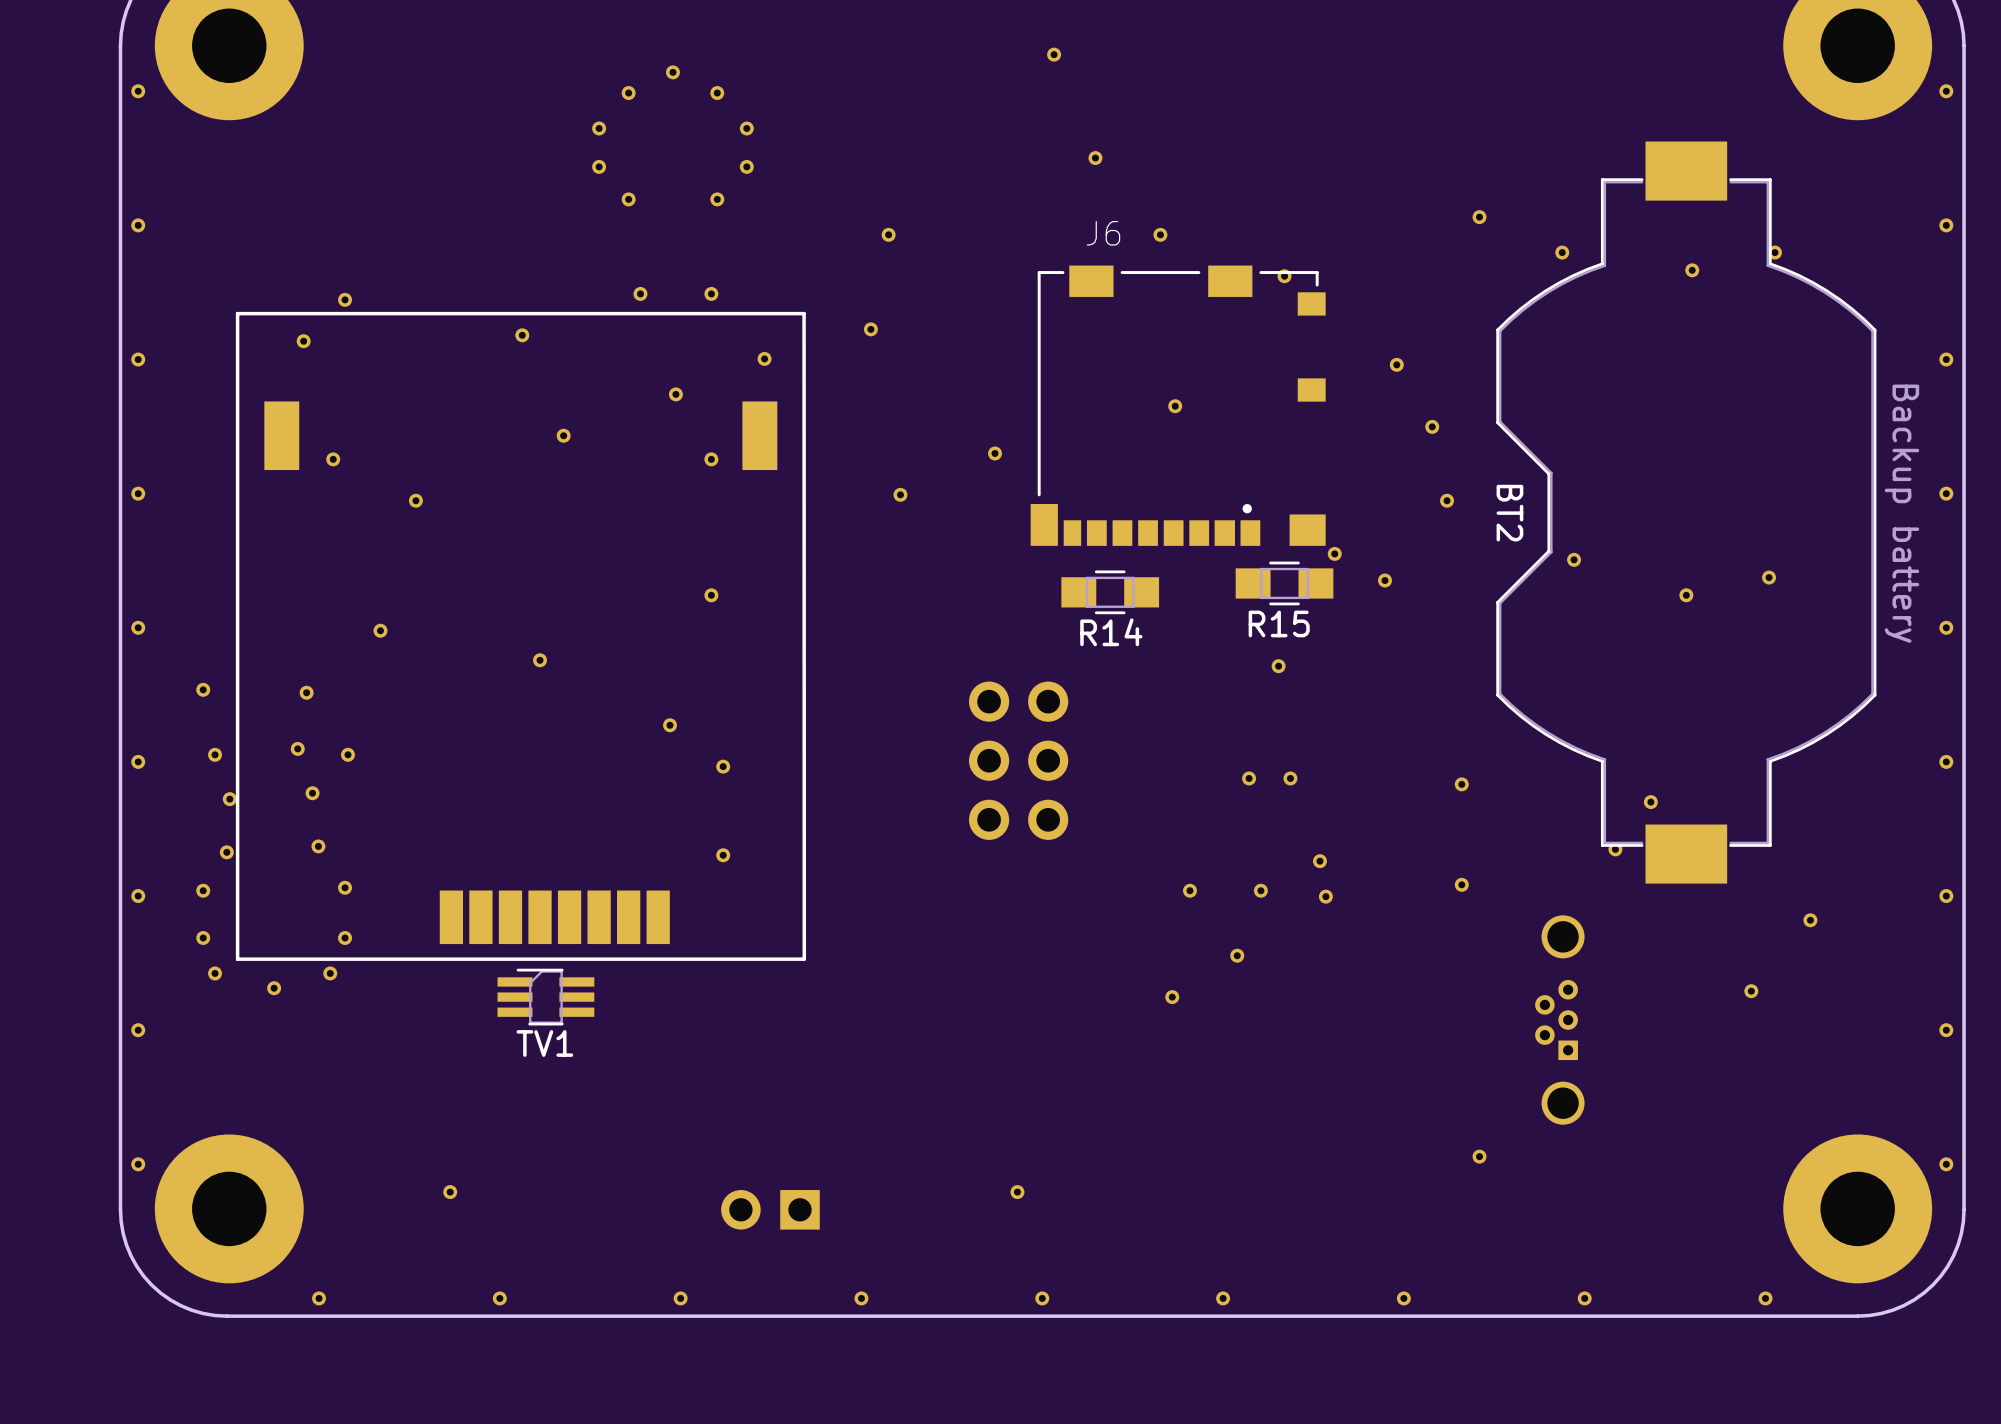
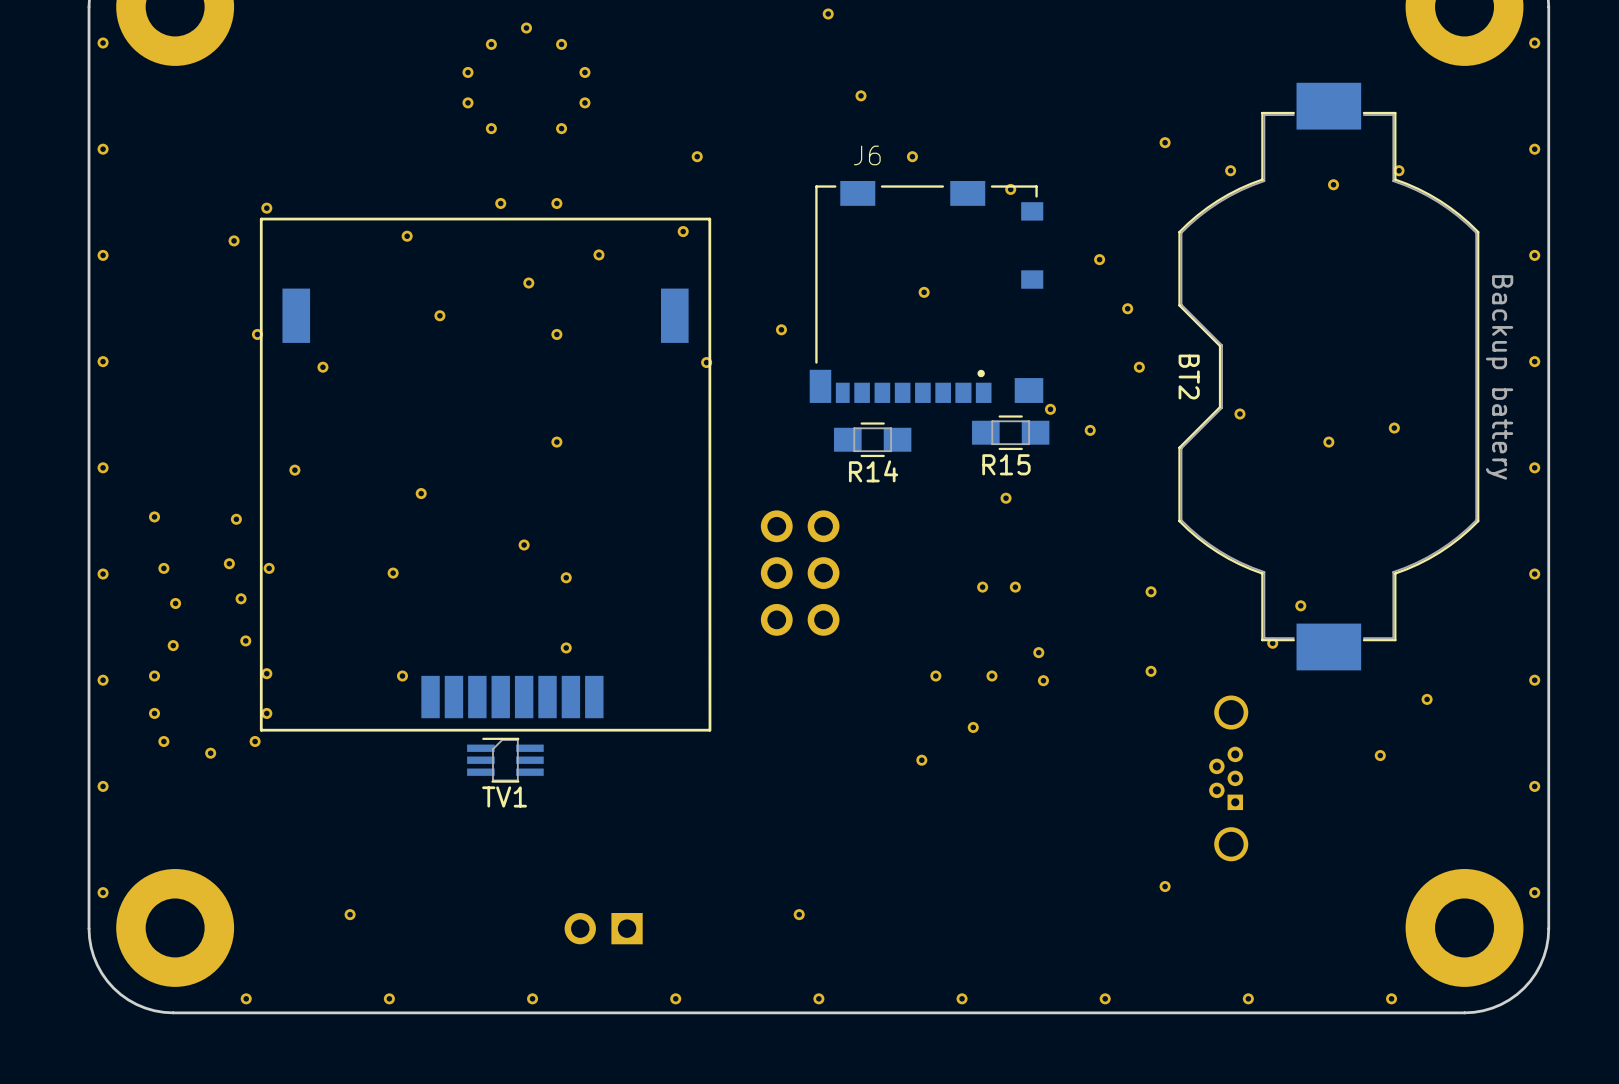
part position: (520, 636) -> (485, 474)
part: none -> (393, 573)
part: none -> (402, 676)
TV1 position: (545, 997) -> (505, 760)

